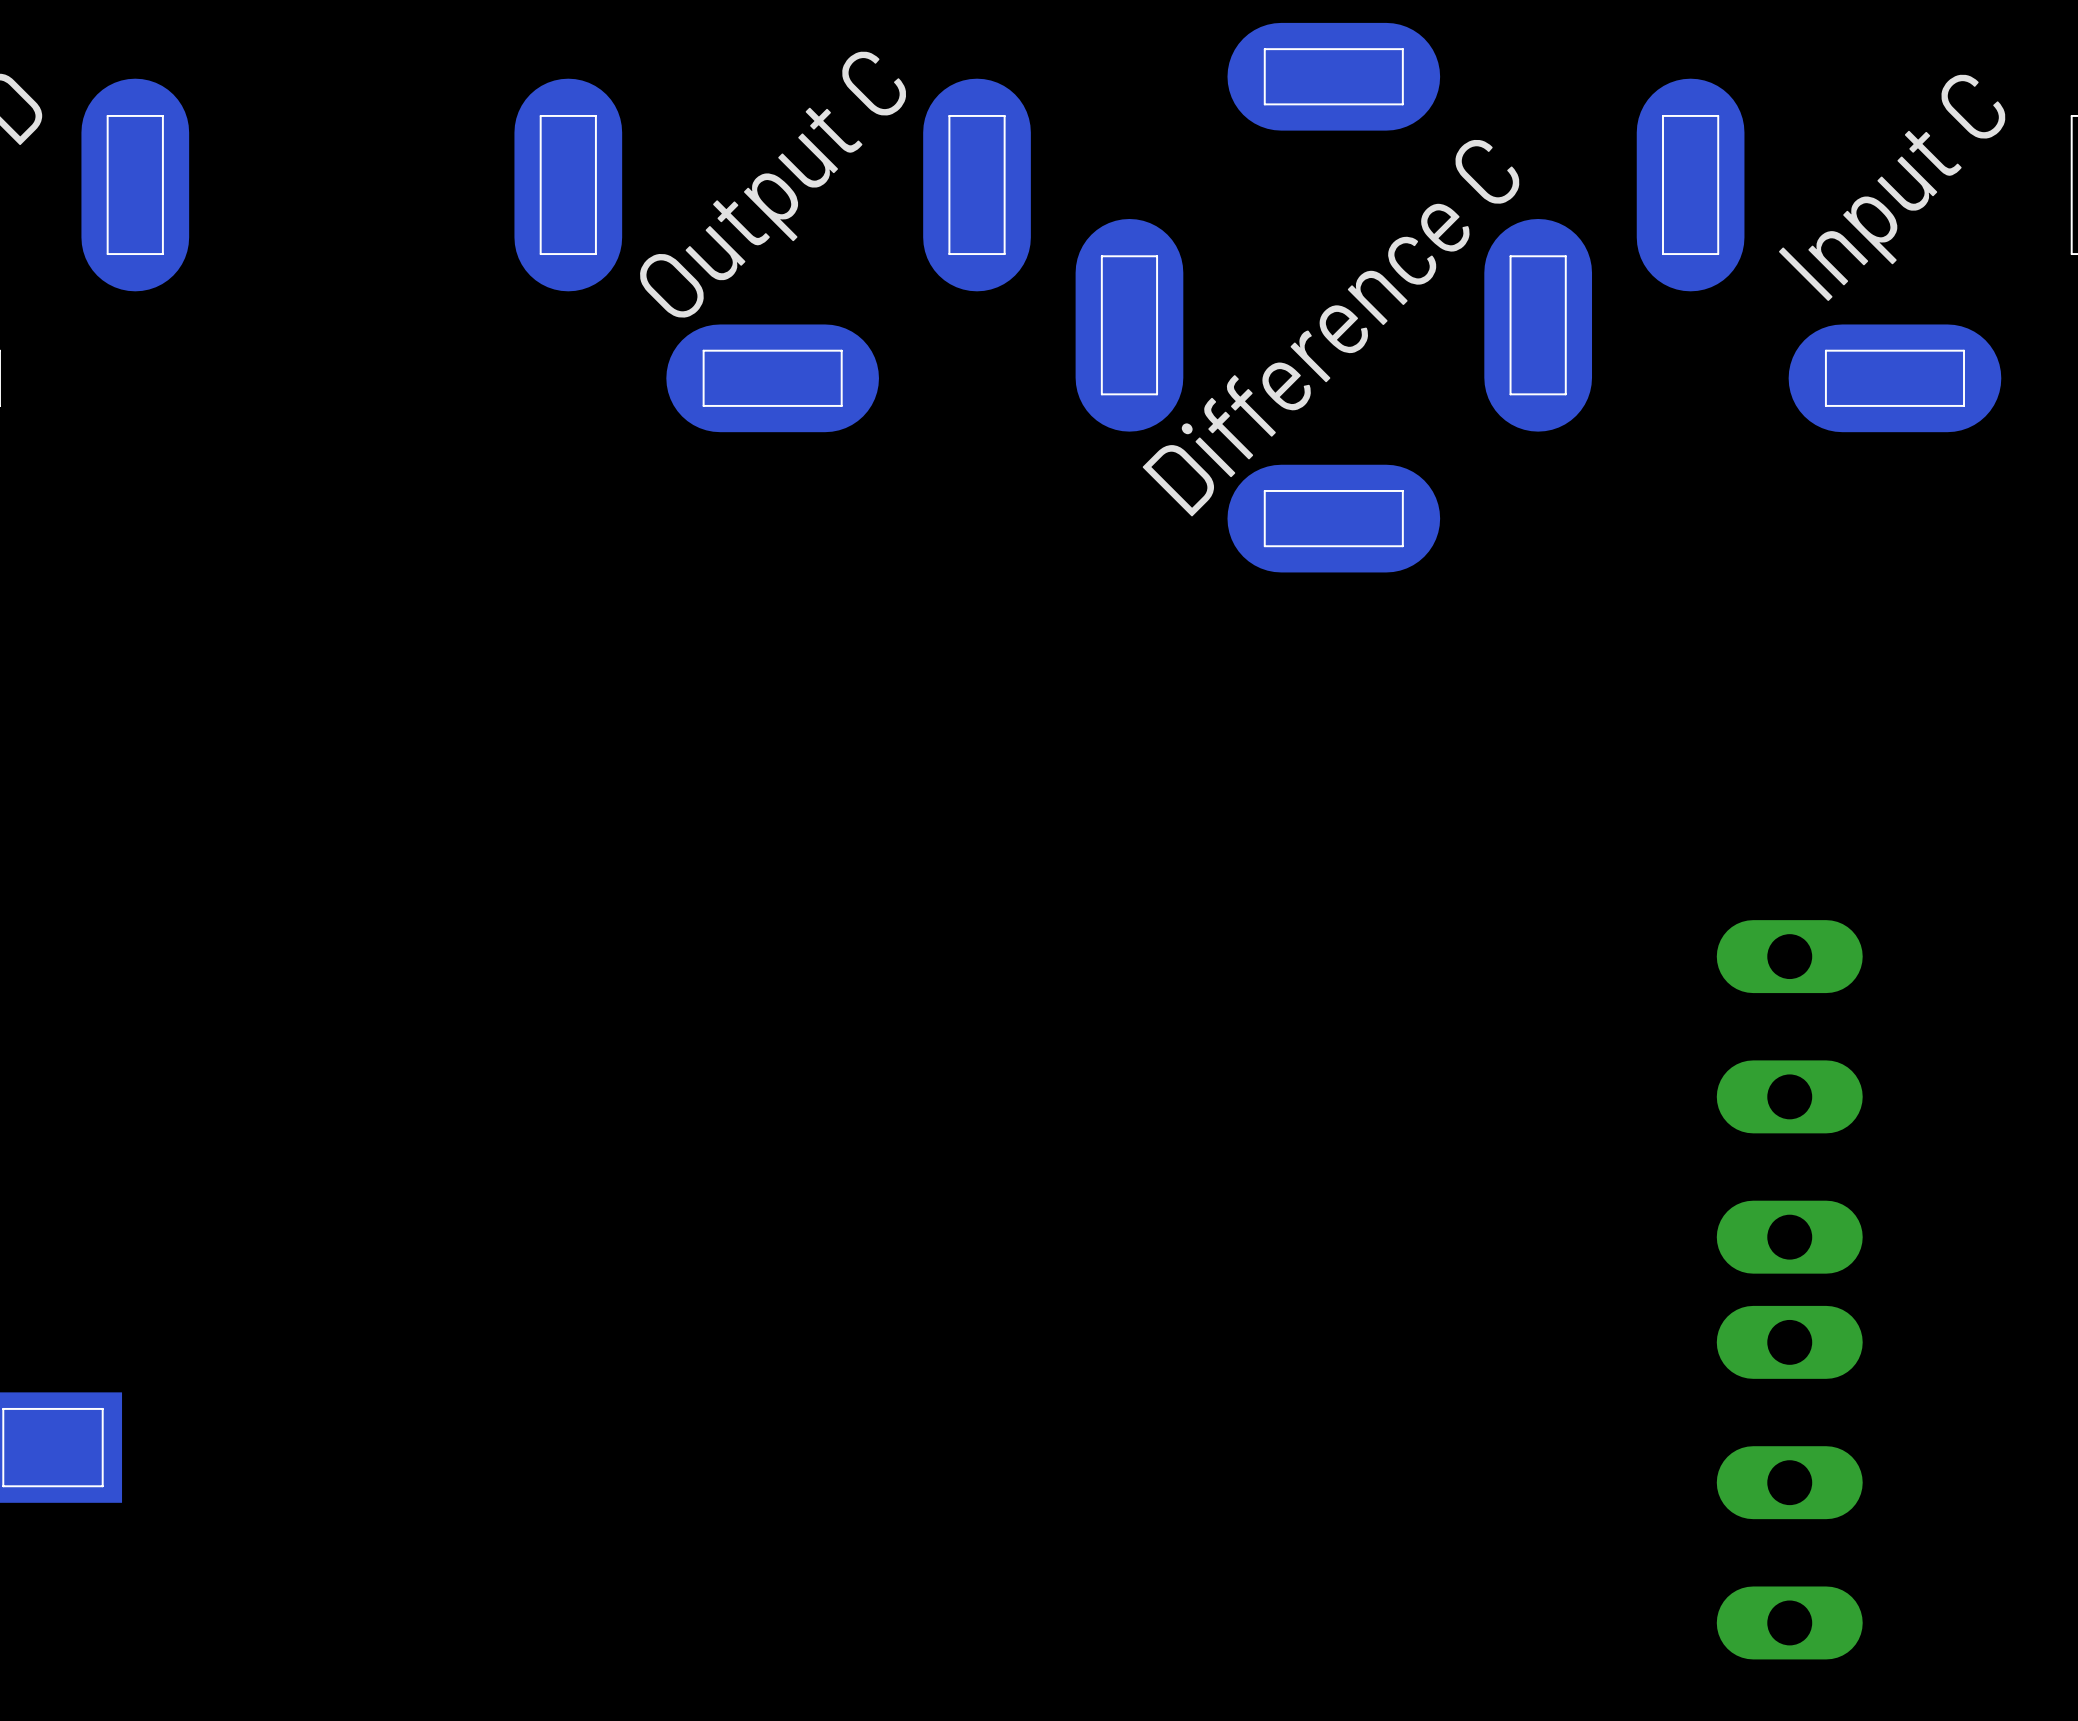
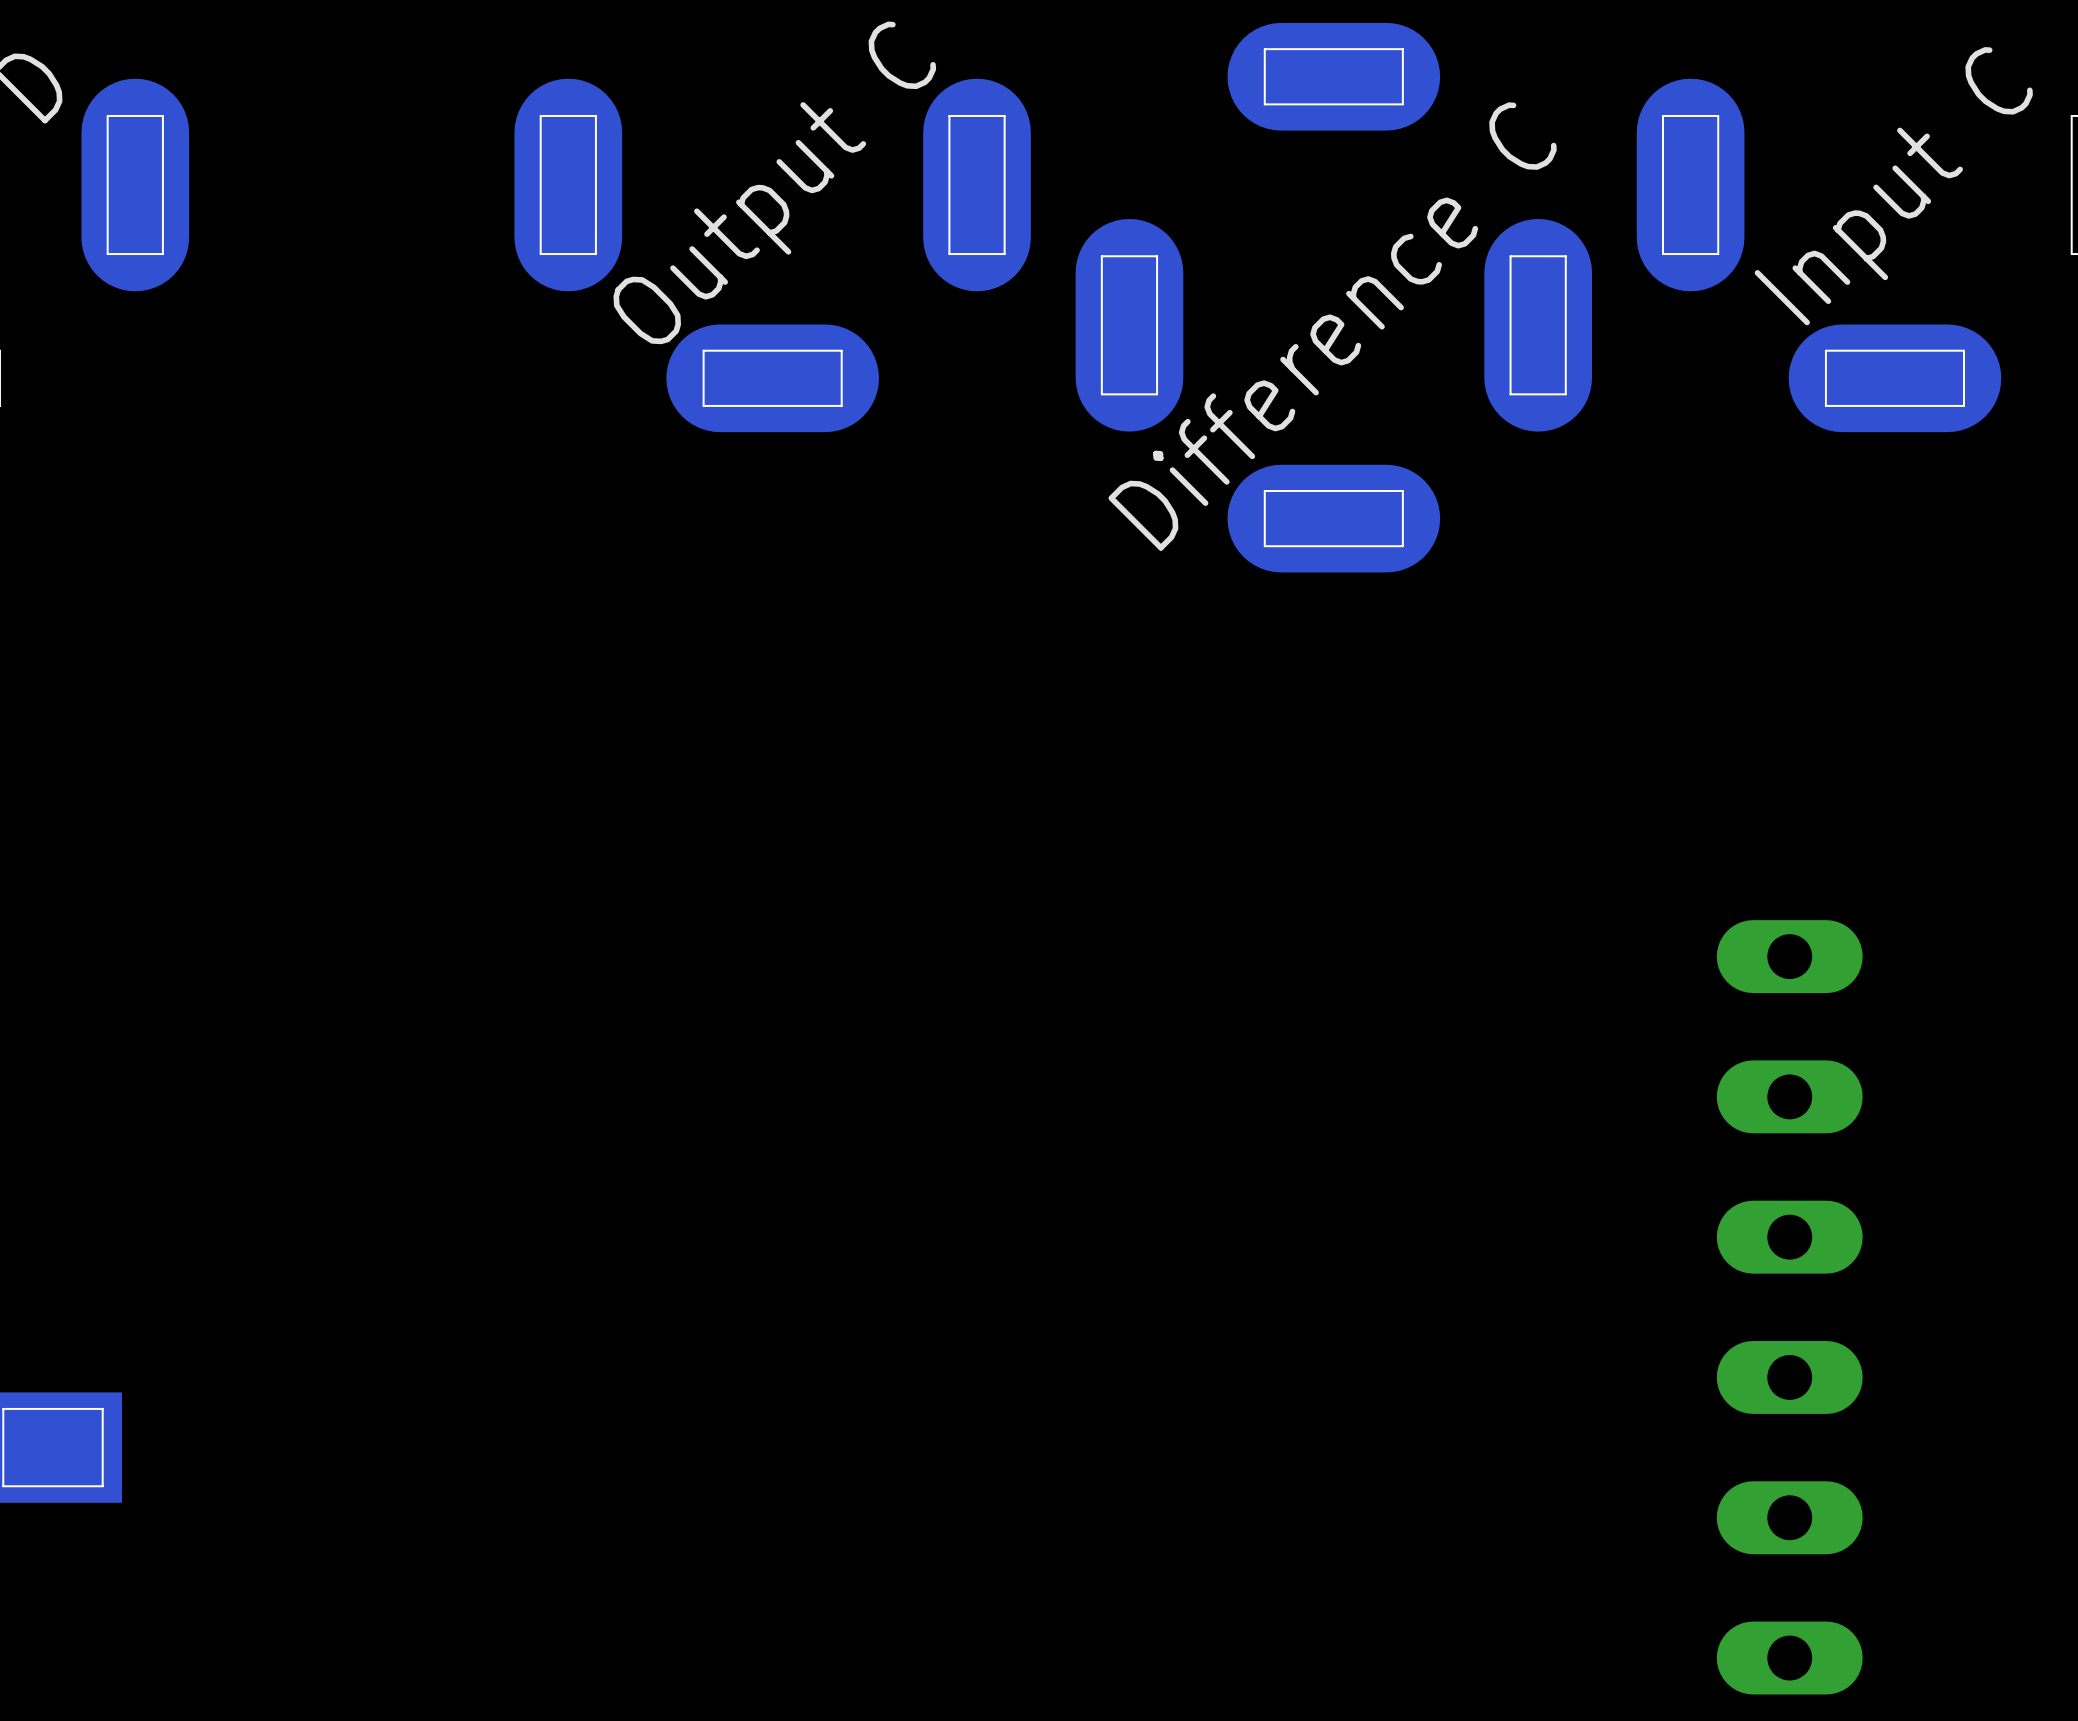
part position: (1789, 1482) -> (1789, 1517)

